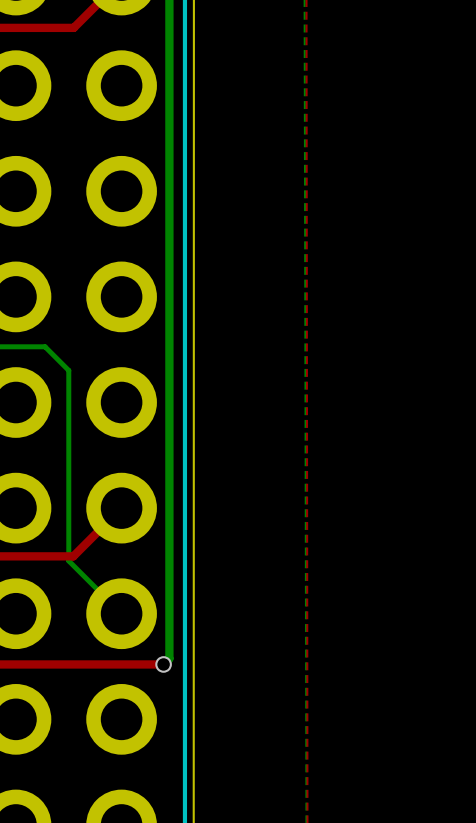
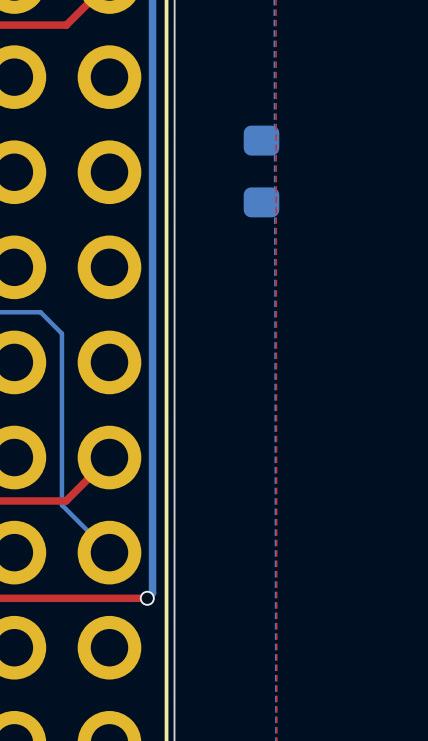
part: none -> (261, 171)

